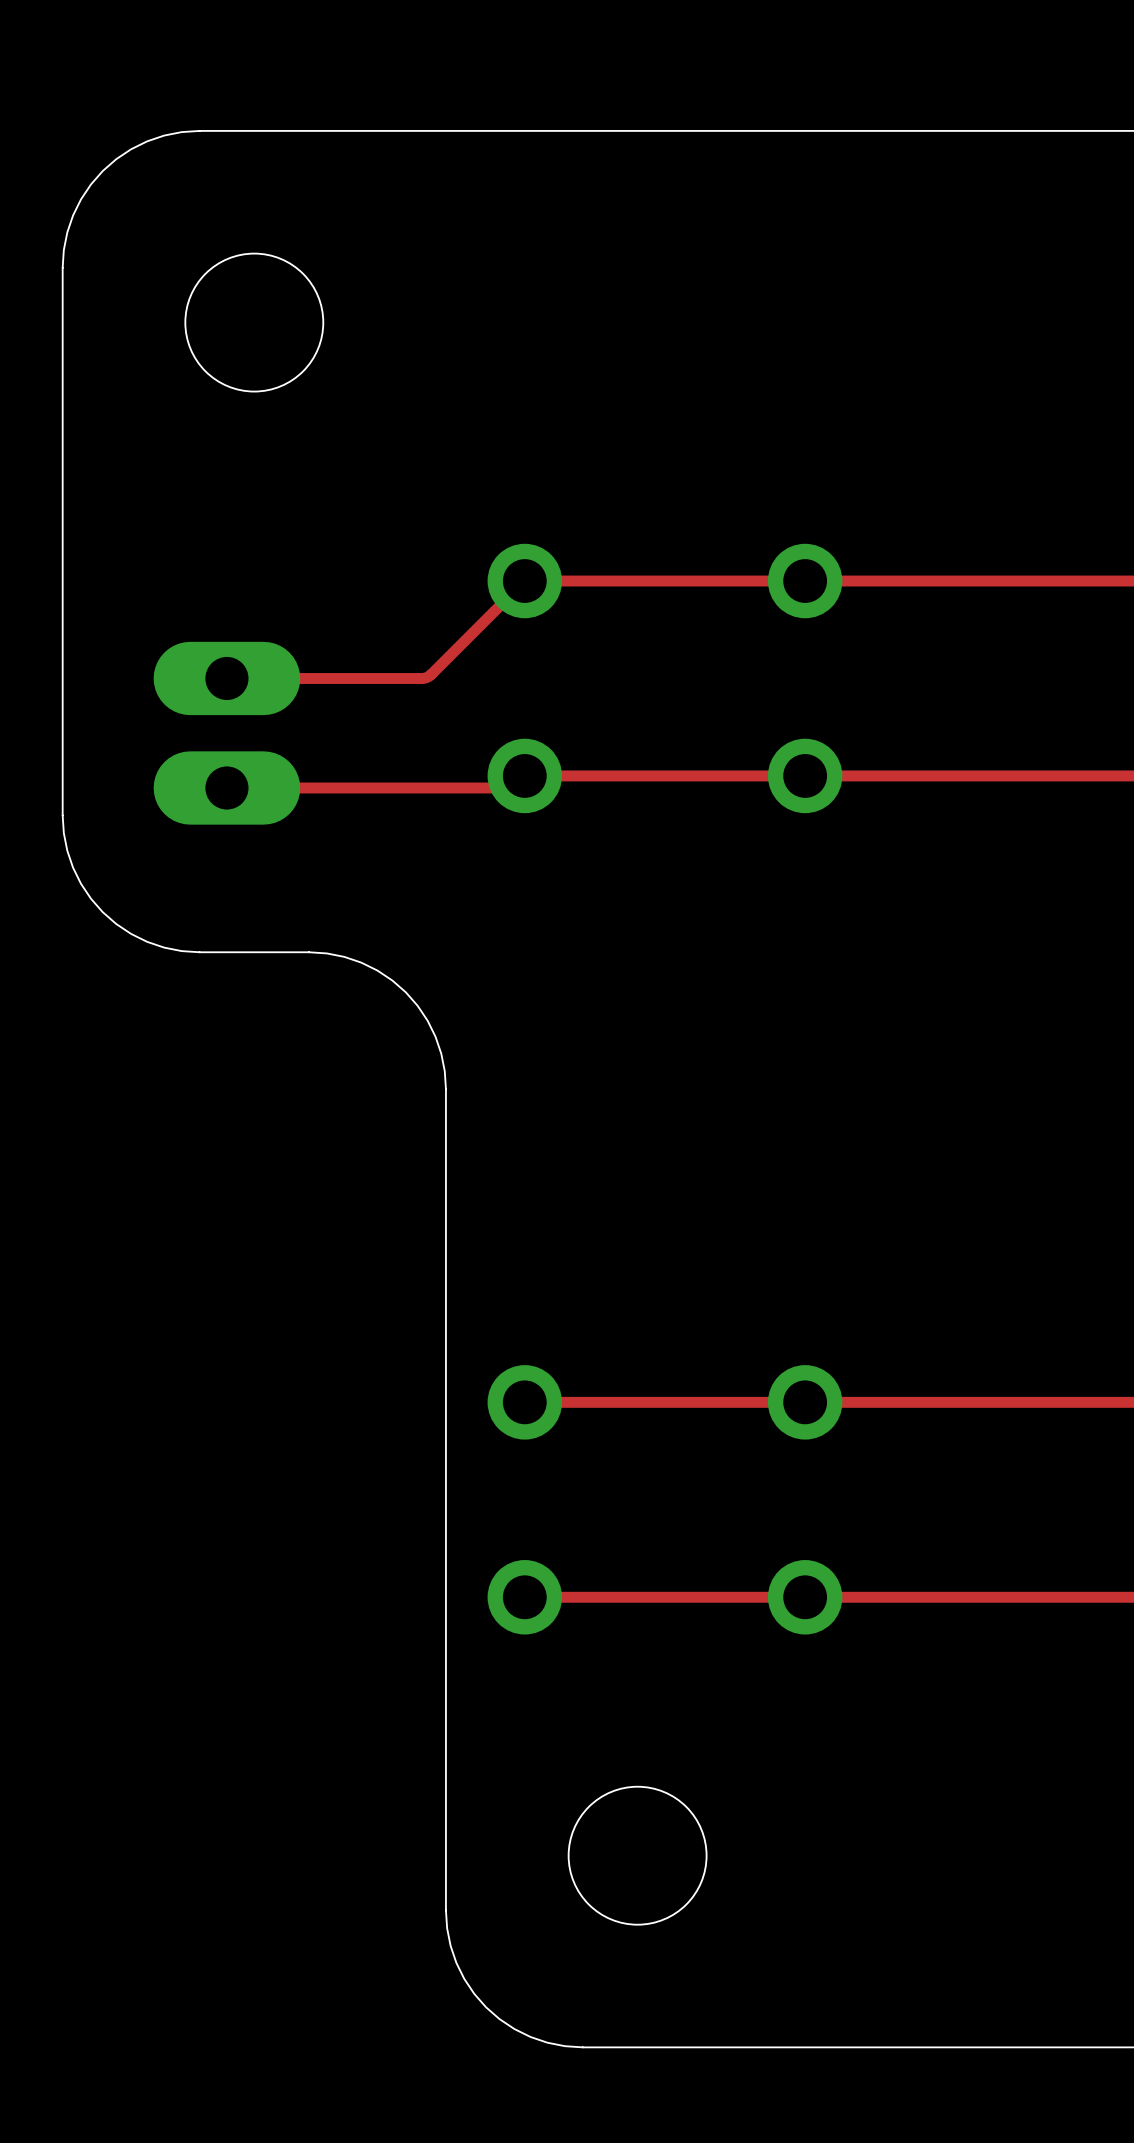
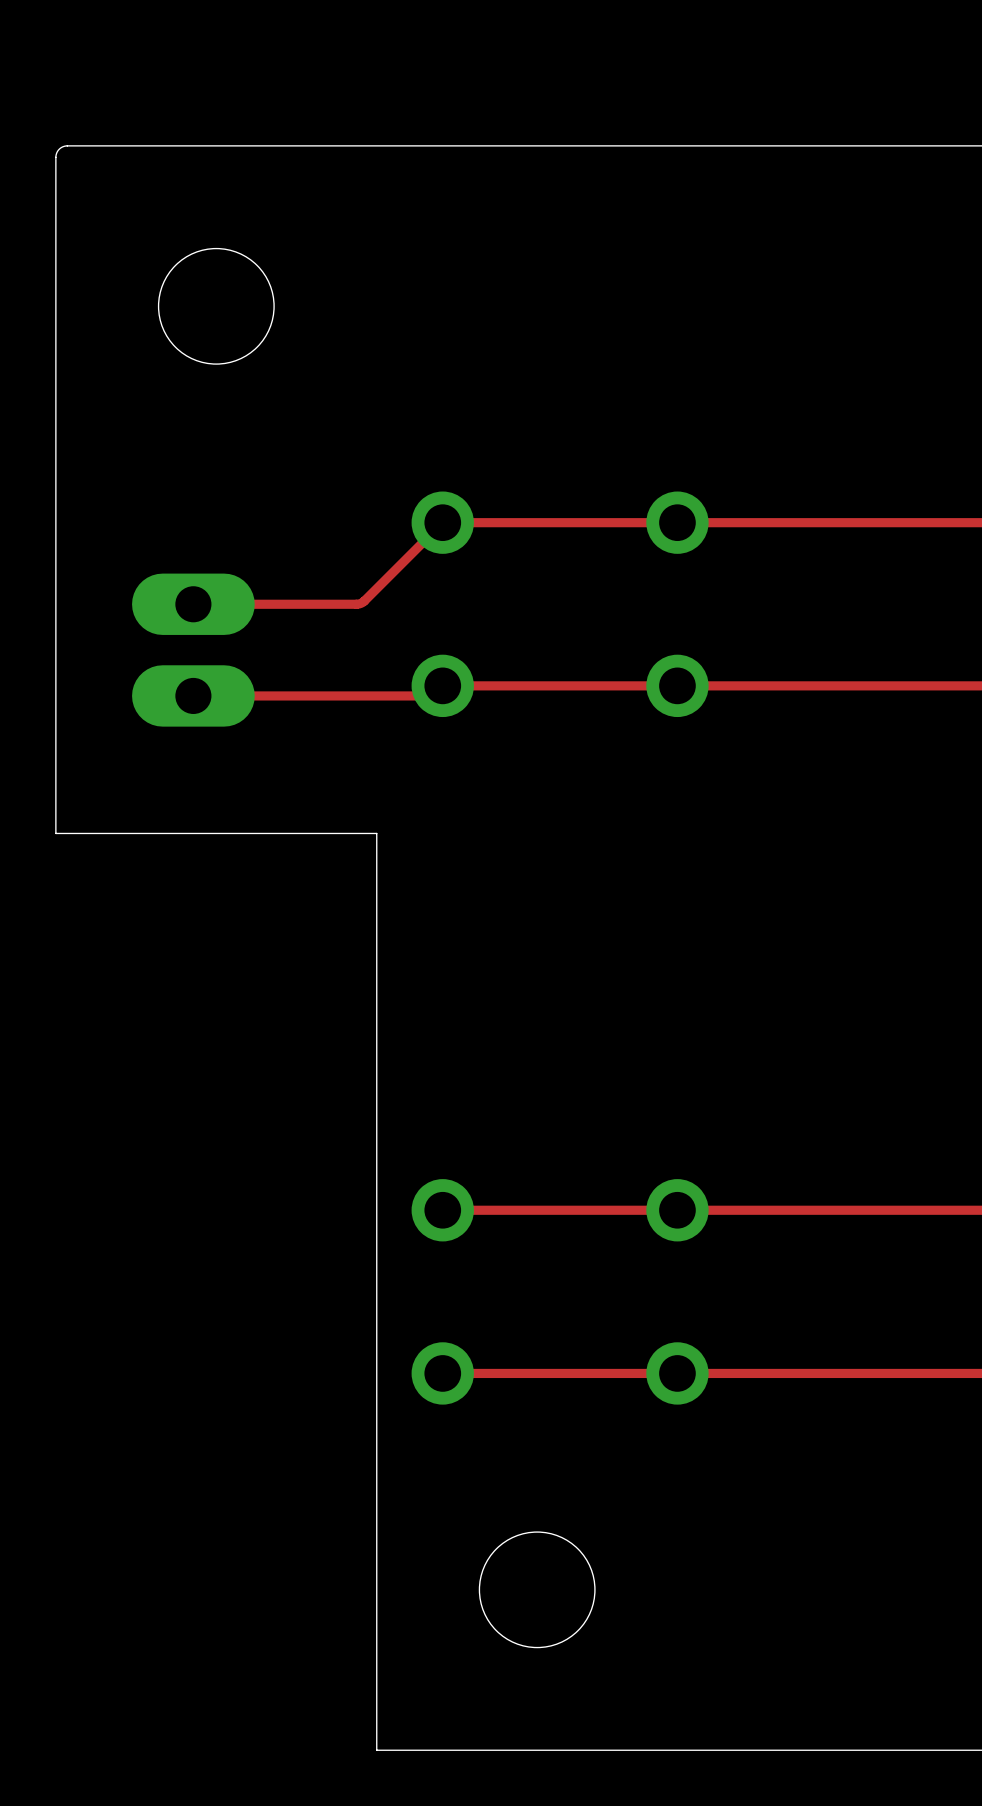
board edge: (199, 130) (164, 135) (147, 141) (131, 149) (102, 171) (81, 199) (73, 215) (67, 232) (62, 267) -> (170, 145) (67, 145) (59, 149) (55, 157) (55, 260)
board edge: (62, 815) (67, 850) (73, 867) (81, 883) (102, 912) (131, 933) (147, 941) (164, 947) (199, 952) -> (55, 718) (55, 833) (170, 833)
board edge: (309, 952) (344, 956) (361, 962) (377, 970) (405, 992) (427, 1020) (435, 1036) (441, 1053) (445, 1089) -> (262, 833) (376, 833) (376, 948)
board edge: (445, 1910) (450, 1945) (456, 1962) (464, 1978) (486, 2007) (514, 2029) (530, 2036) (547, 2042) (582, 2047) -> (376, 1635) (376, 1750) (491, 1750)

